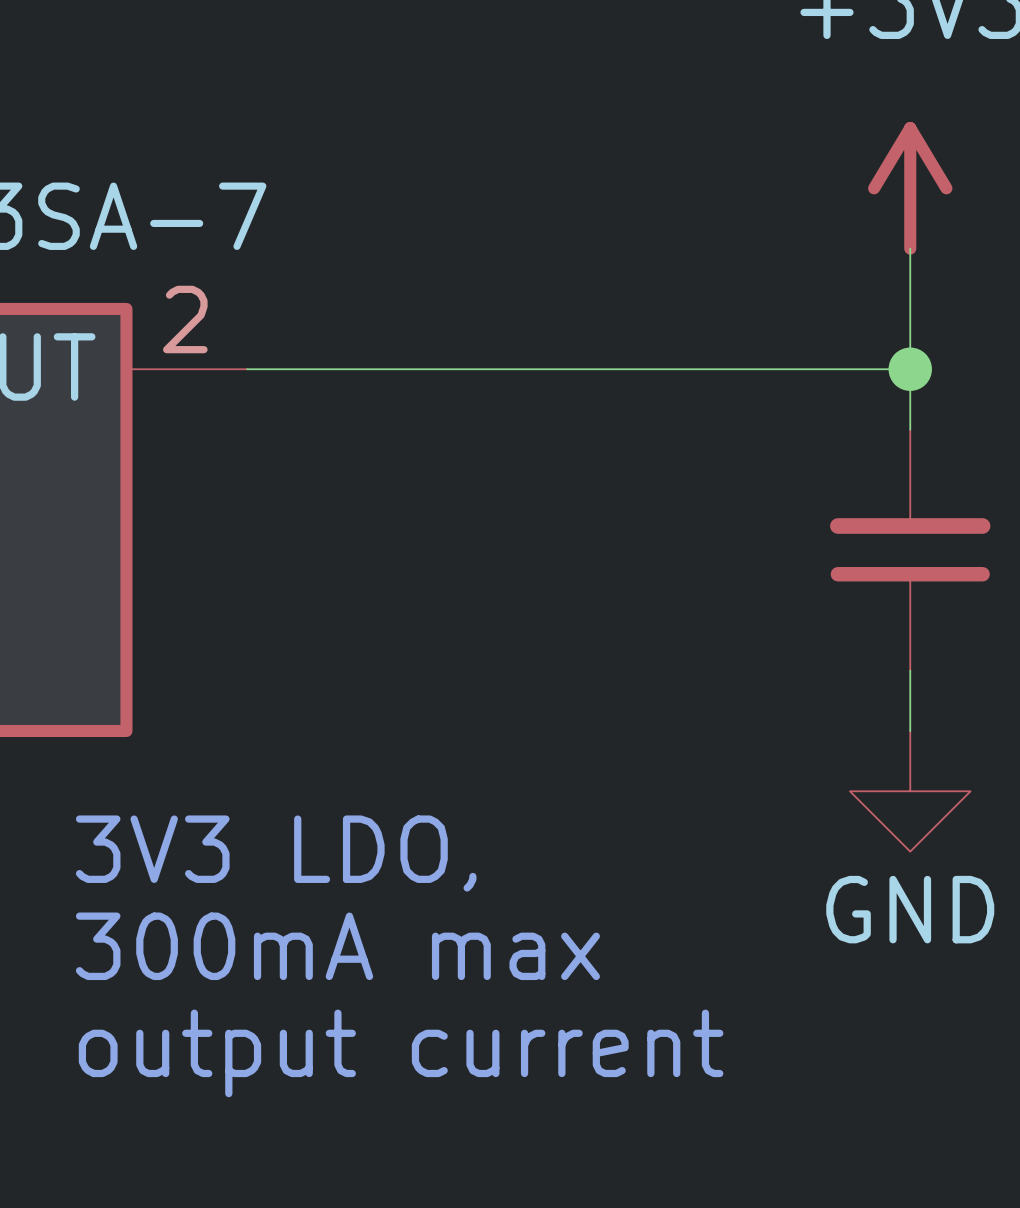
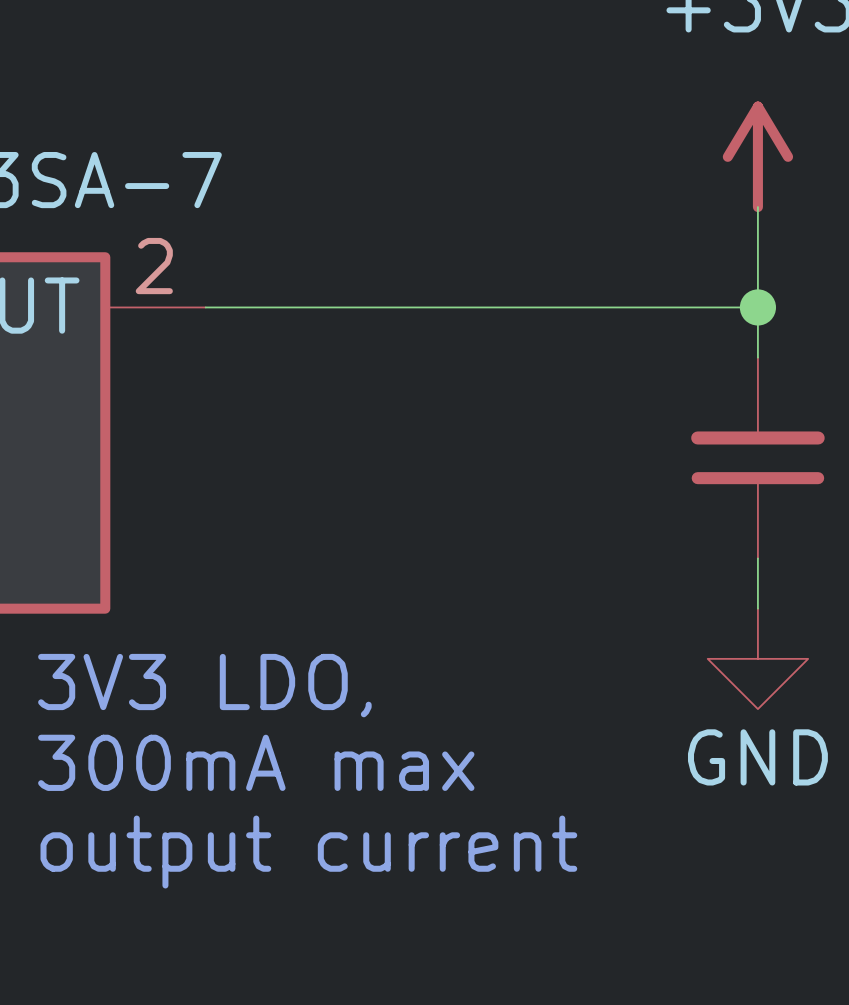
text position: 3V3 LDO, (276, 853) -> 3V3 LDO, (204, 685)
text position: 300mA max (337, 946) -> 300mA max (256, 762)
text position: output current (401, 1053) -> output current (308, 852)

